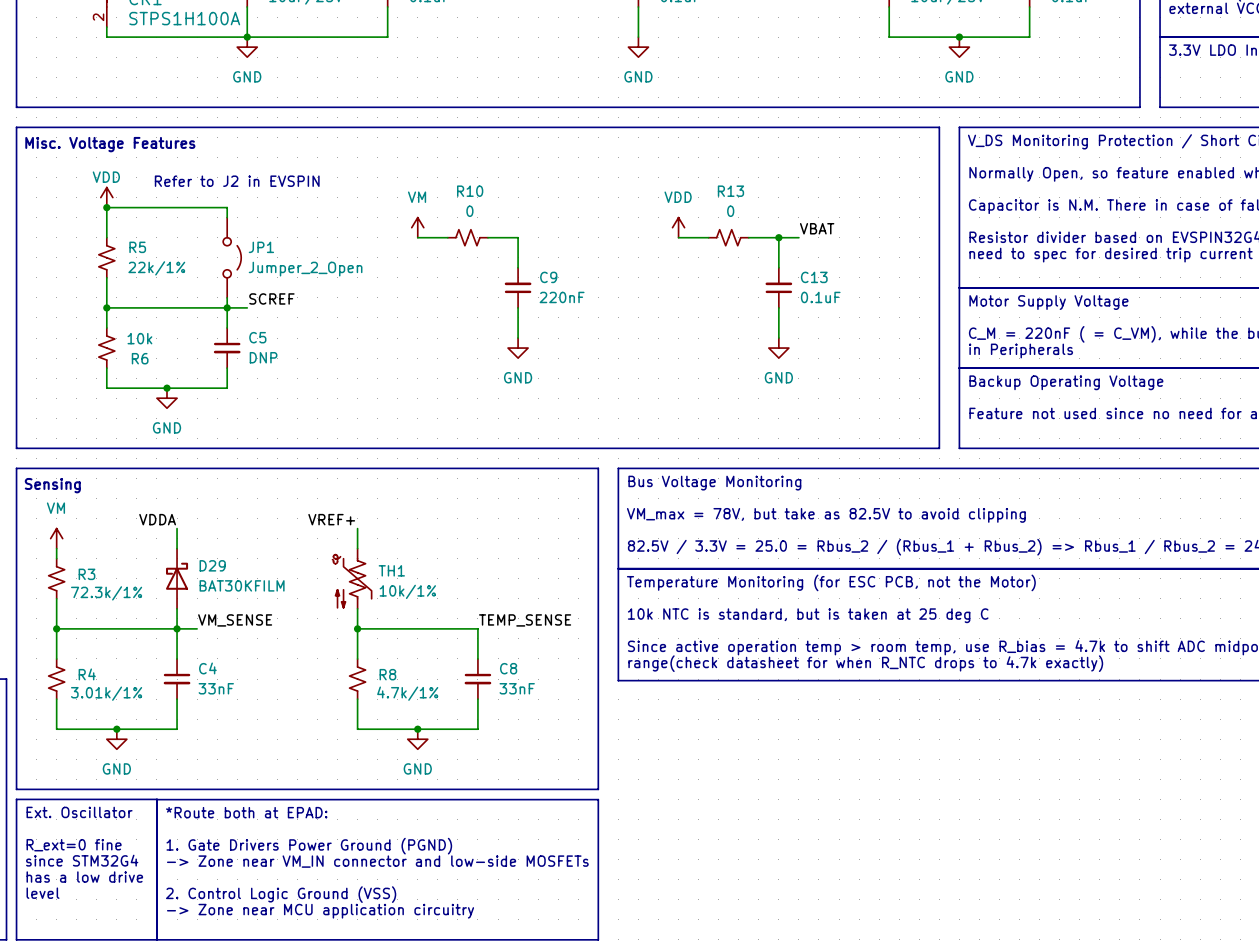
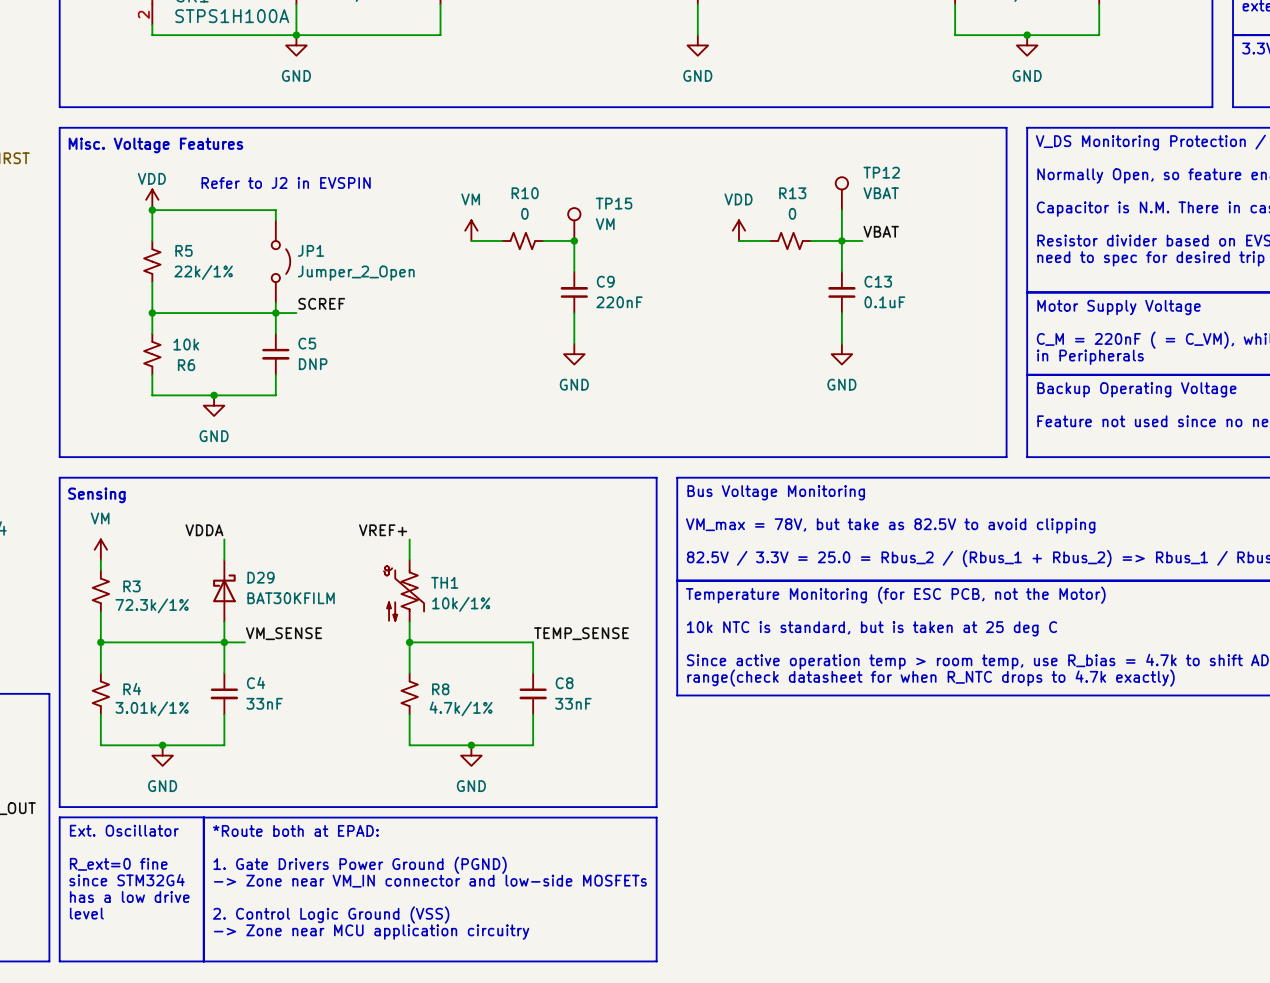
TP12: none -> VBAT (841, 193)
wire: none -> (841, 210) (841, 240)
TP15: none -> VM (574, 224)
junction: none -> (574, 240)

